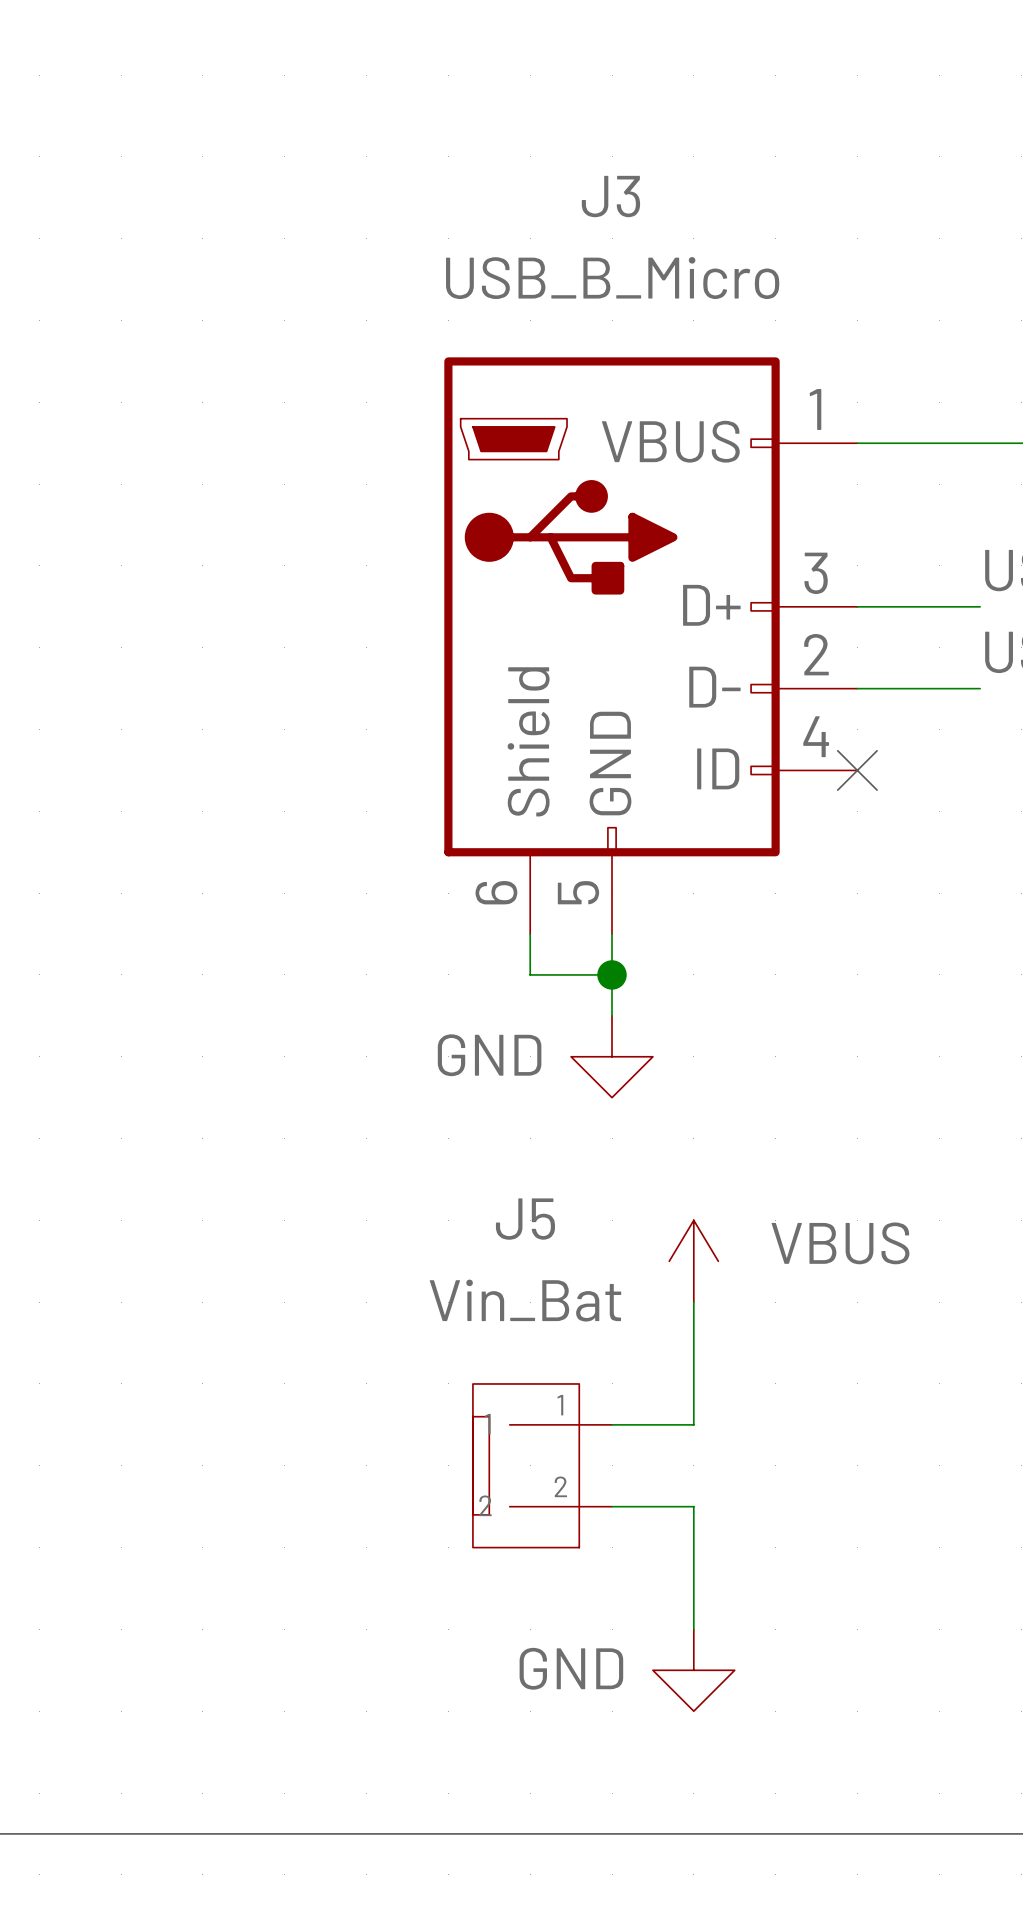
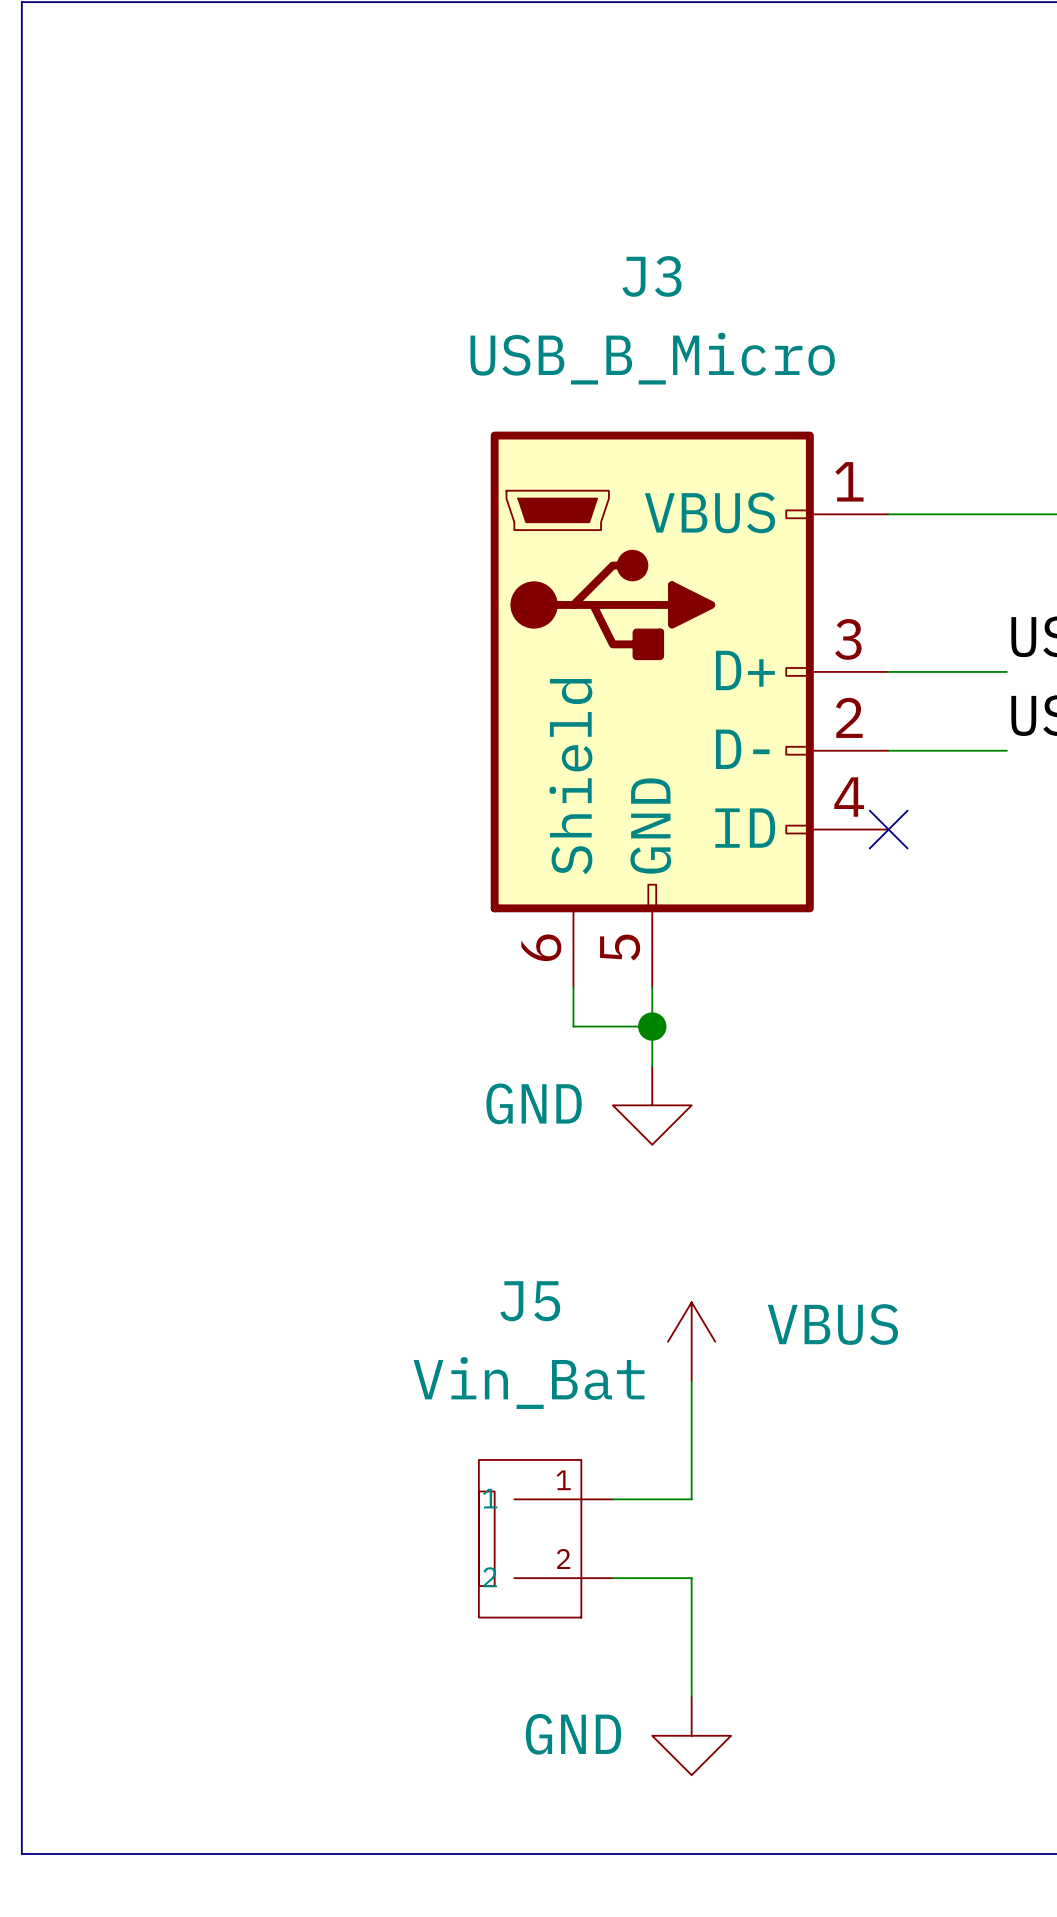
power symbol position: VBUS (693, 1261) -> VBUS (691, 1341)
wire: (693, 1302) (693, 1424) (612, 1424) -> (691, 1381) (691, 1499) (612, 1499)
J5 position: (542, 1465) -> (545, 1538)
wire: (612, 1506) (693, 1506) (693, 1629) -> (612, 1578) (691, 1578) (691, 1696)
power symbol position: GND (693, 1670) -> GND (691, 1735)

